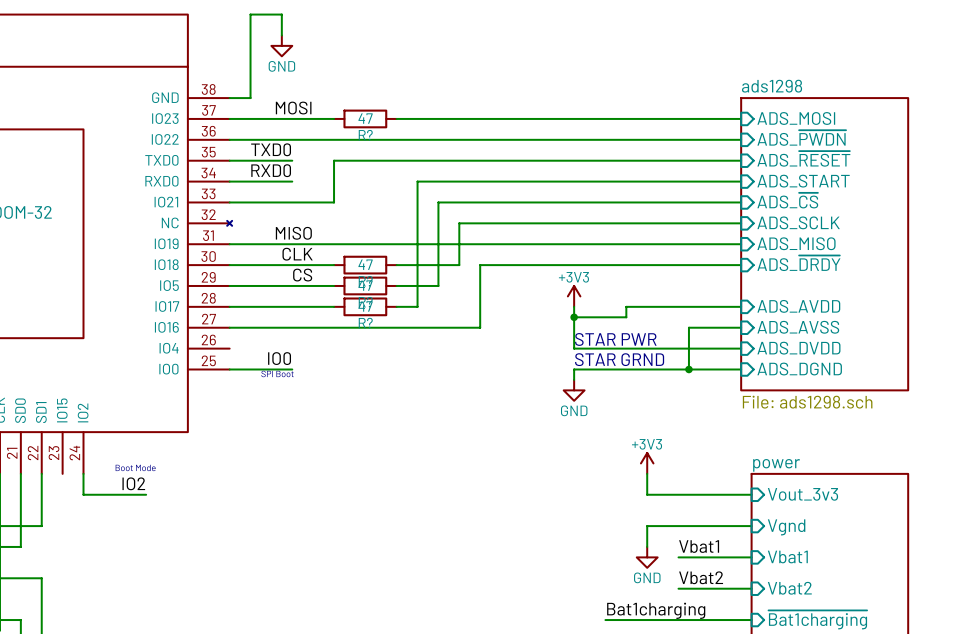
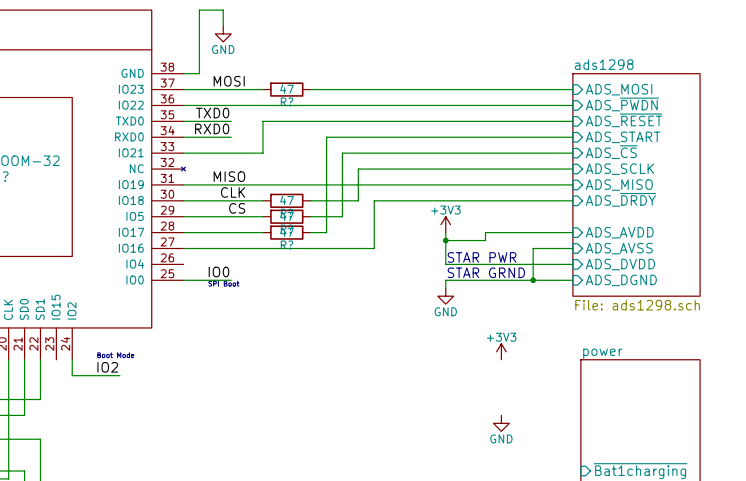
wire: (647, 473) (647, 494) (751, 494) -> none
sheet pin: Vout_3v3 (802, 494) -> none
wire: (751, 526) (647, 526) (647, 546) -> none
sheet pin: Vgnd (786, 527) -> none
label: Vbat1 (699, 546) -> none
sheet pin: Vbat1 (787, 556) -> none
wire: (678, 557) (751, 557) -> none
label: Vbat2 (701, 577) -> none
wire: (678, 588) (751, 588) -> none
sheet pin: Vbat2 (789, 588) -> none
label: Bat1charging (656, 610) -> none
wire: (605, 620) (751, 620) -> none

